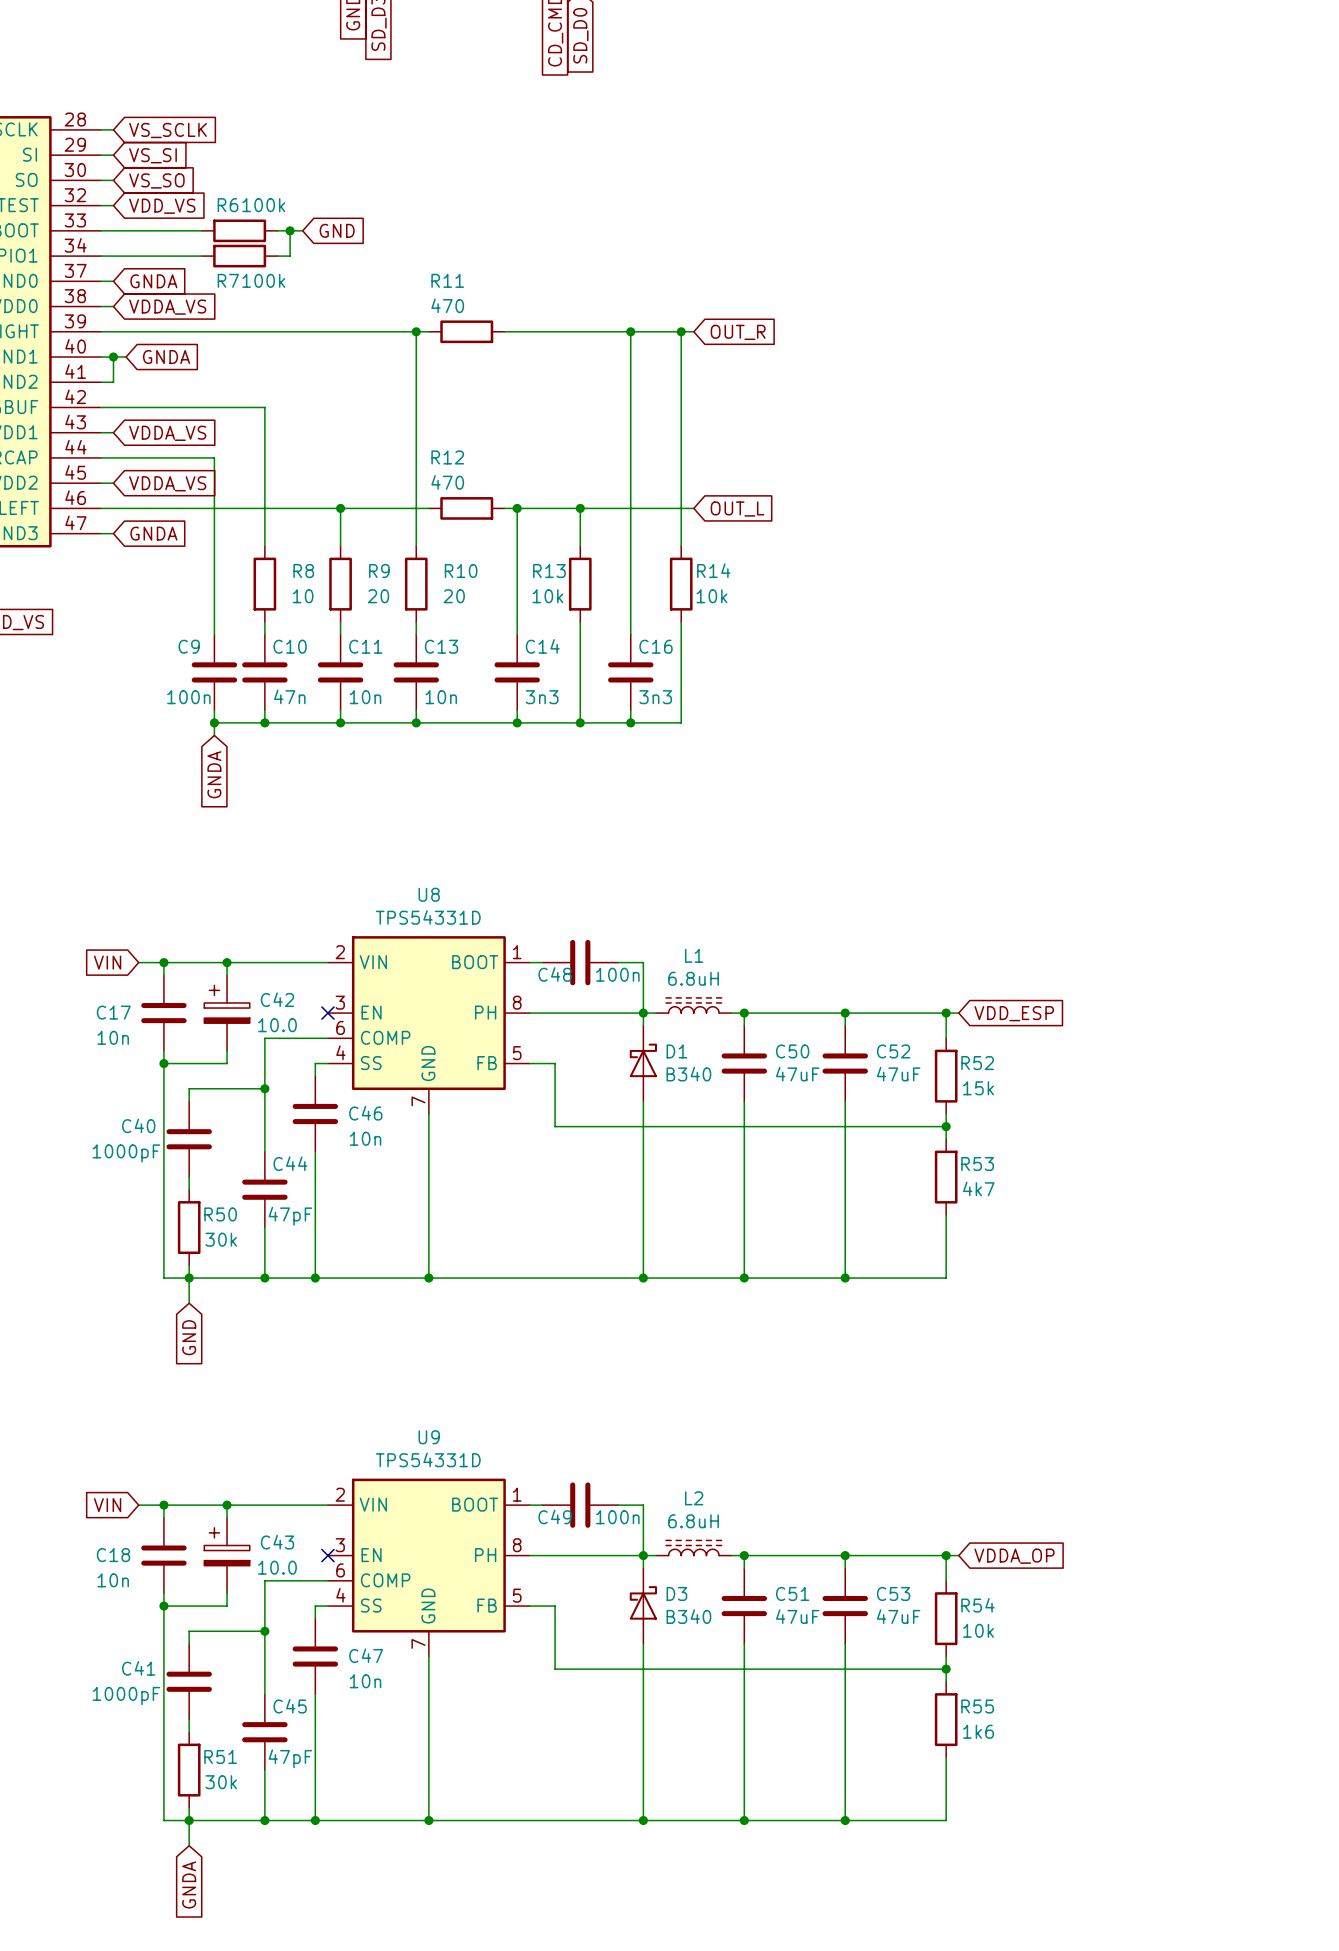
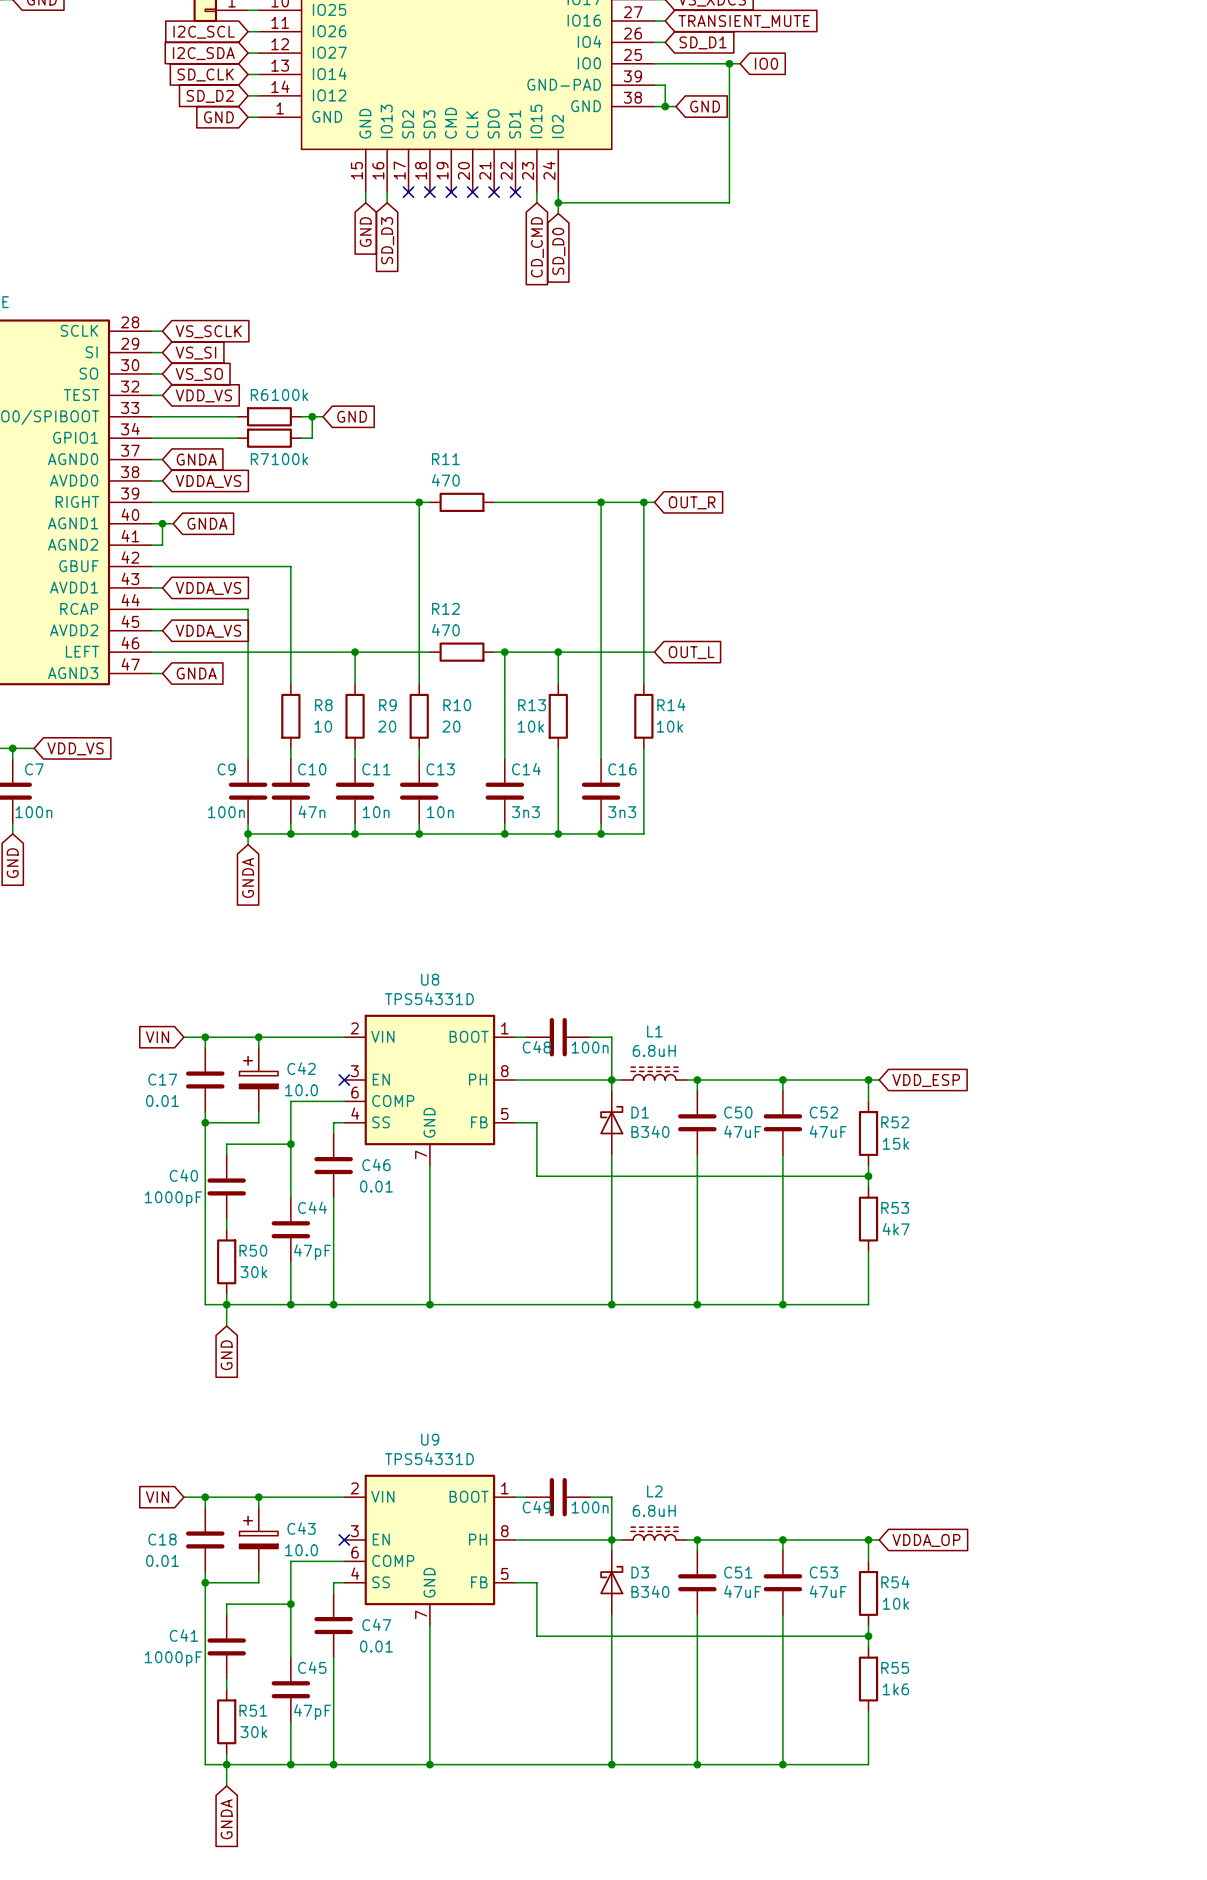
C17 value: 10n (113, 1037) -> 0.01 (162, 1100)
C46 value: 10n (365, 1138) -> 0.01 (376, 1186)
C18 value: 10n (113, 1580) -> 0.01 (162, 1560)
C47 value: 10n (365, 1681) -> 0.01 (376, 1646)

